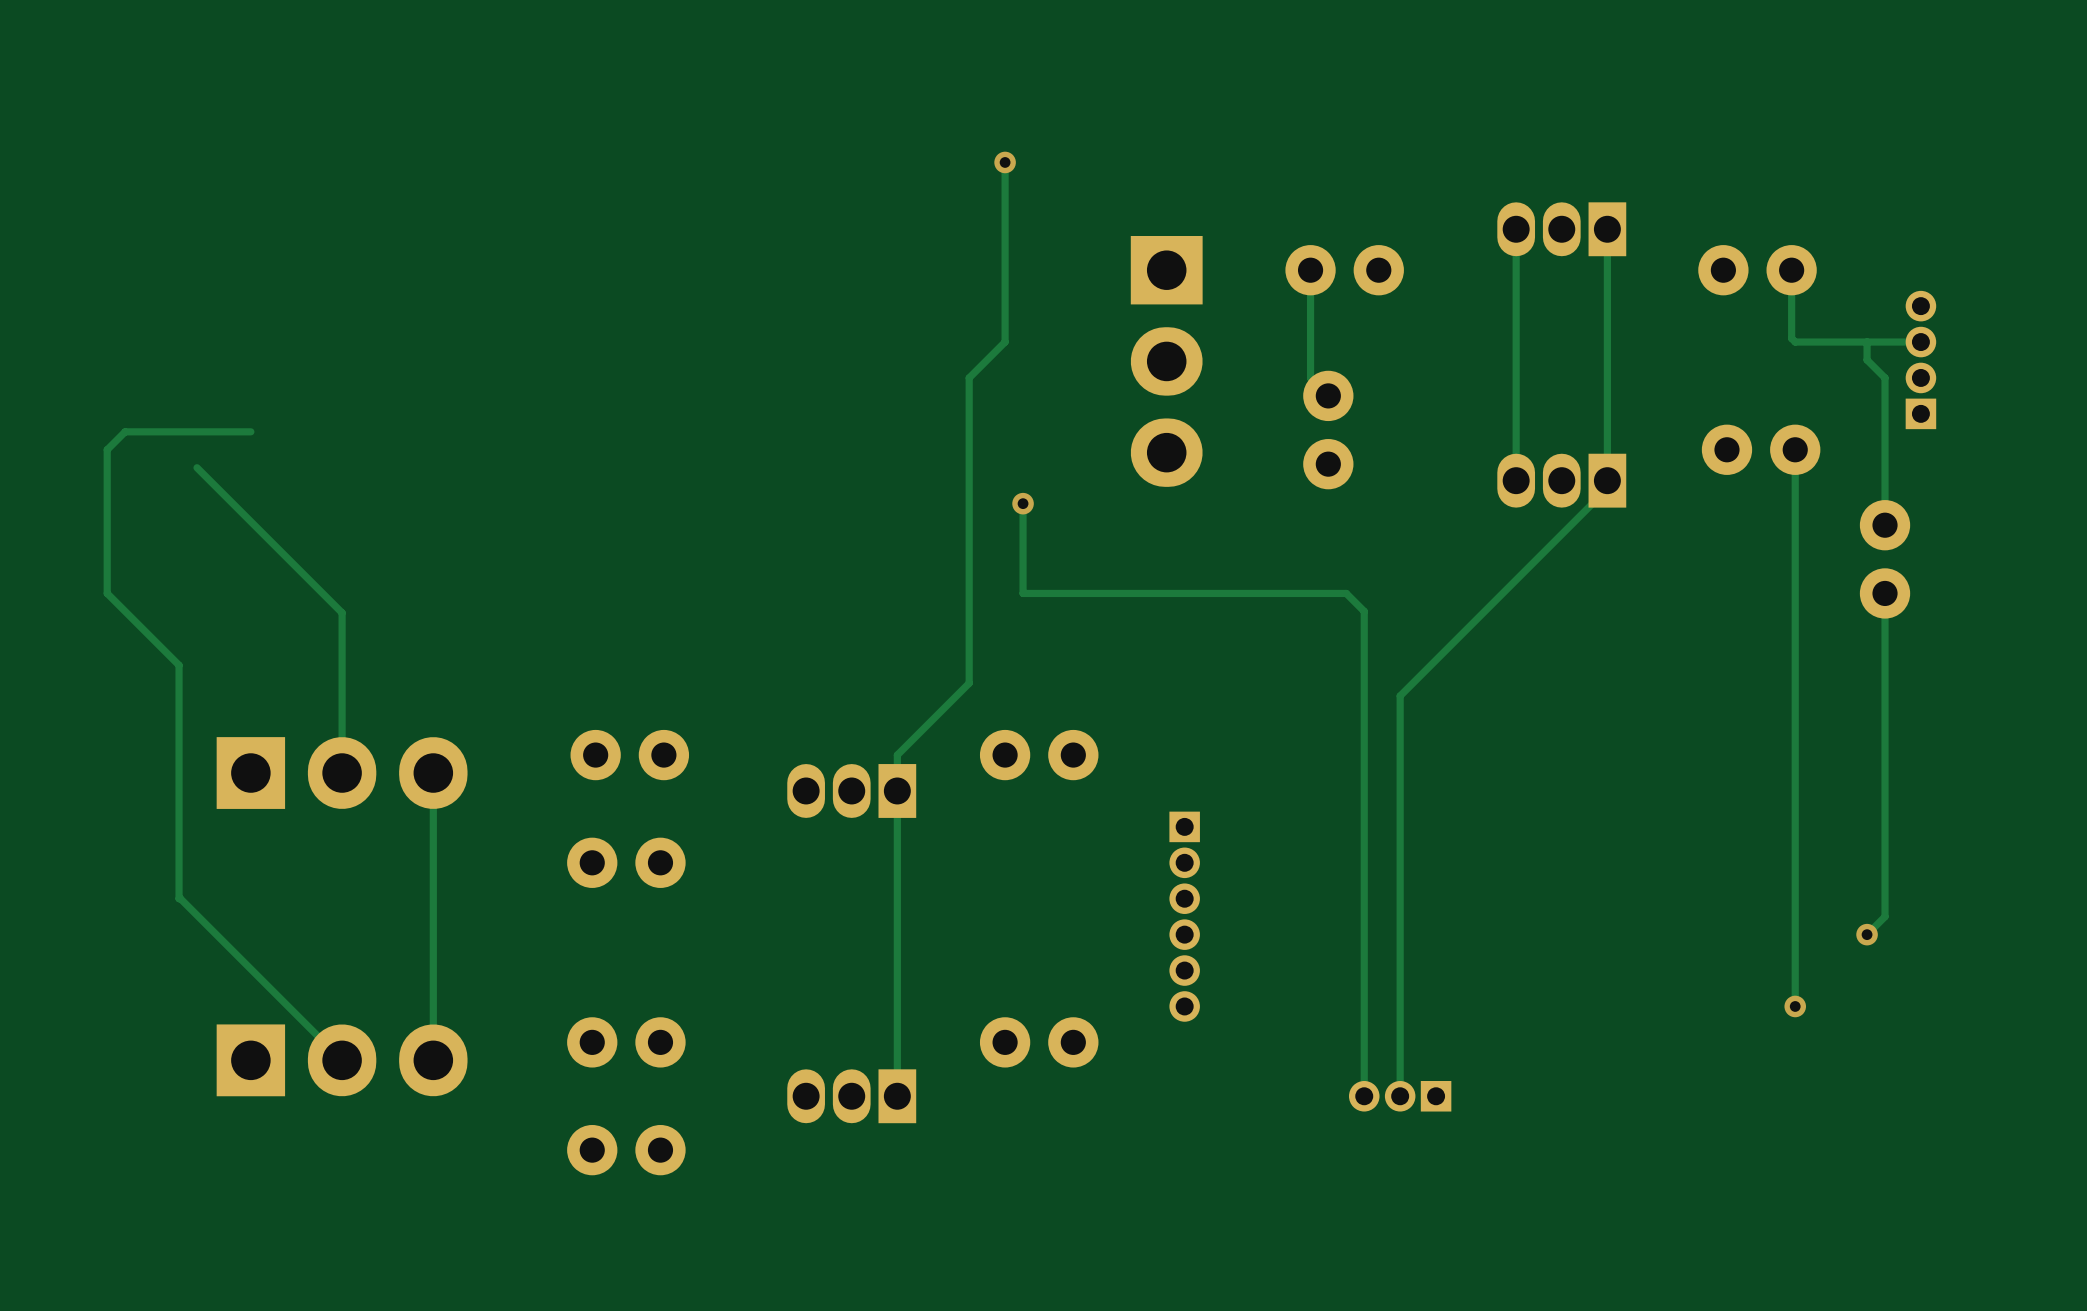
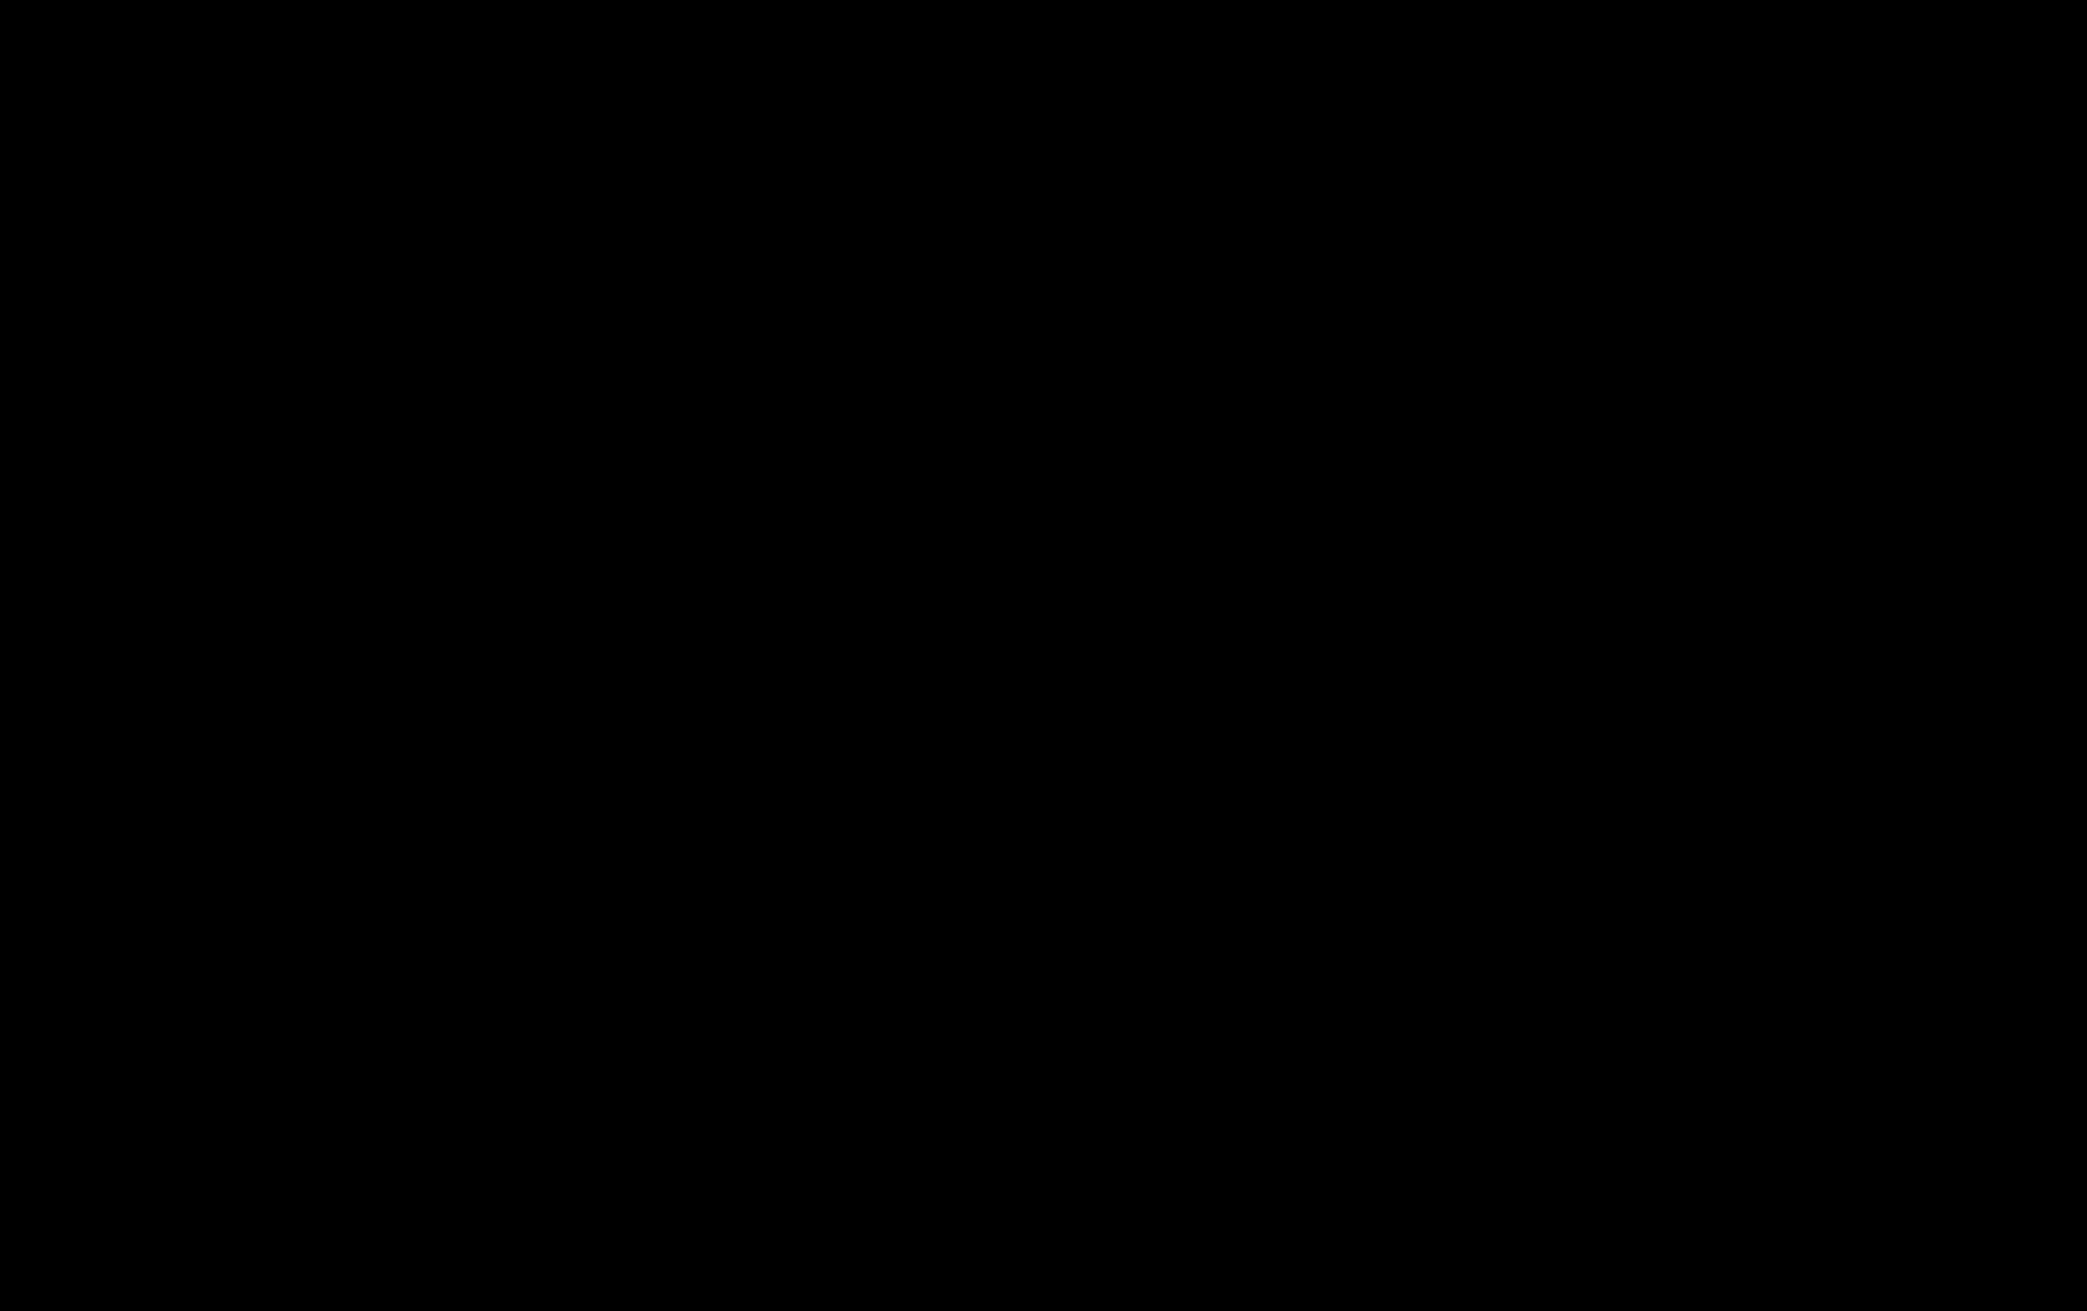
track: (1005, 162) (1005, 342) (969, 377) (969, 683) (897, 755) (897, 1096) -> none
via: (1005, 162) -> none
track: (1516, 229) (1516, 480) -> none
part: (1561, 229) -> none
track: (1607, 229) (1607, 488) (1400, 695) (1400, 1096) -> none
track: (1310, 270) (1310, 378) (1328, 395) -> none
part: (1344, 270) -> none
part: (1757, 270) -> none
track: (1791, 270) (1791, 338) (1795, 342) (1920, 342) -> none
track: (1867, 342) (1867, 360) (1885, 377) (1885, 525) -> none
part: (1920, 360) -> none
part: (1166, 361) -> none
part: (1328, 430) -> none
track: (250, 431) (125, 431) (107, 449) (107, 593) (179, 665) (179, 898) (342, 1060) -> none
part: (1761, 449) -> none
track: (1795, 449) (1795, 1006) -> none
track: (197, 467) (342, 612) (342, 773) -> none
part: (1561, 480) -> none
track: (1023, 503) (1023, 593) (1346, 593) (1364, 611) (1364, 1096) -> none
via: (1023, 503) -> none
part: (1885, 559) -> none
track: (1885, 593) (1885, 916) (1867, 934) -> none
part: (629, 755) -> none
part: (1039, 755) -> none
part: (342, 773) -> none
track: (433, 773) (433, 1060) -> none
part: (851, 790) -> none
part: (626, 862) -> none
part: (1184, 916) -> none
via: (1867, 934) -> none
via: (1795, 1006) -> none
part: (626, 1042) -> none
part: (1039, 1042) -> none
part: (342, 1060) -> none
part: (851, 1096) -> none
part: (1400, 1096) -> none
part: (626, 1150) -> none

